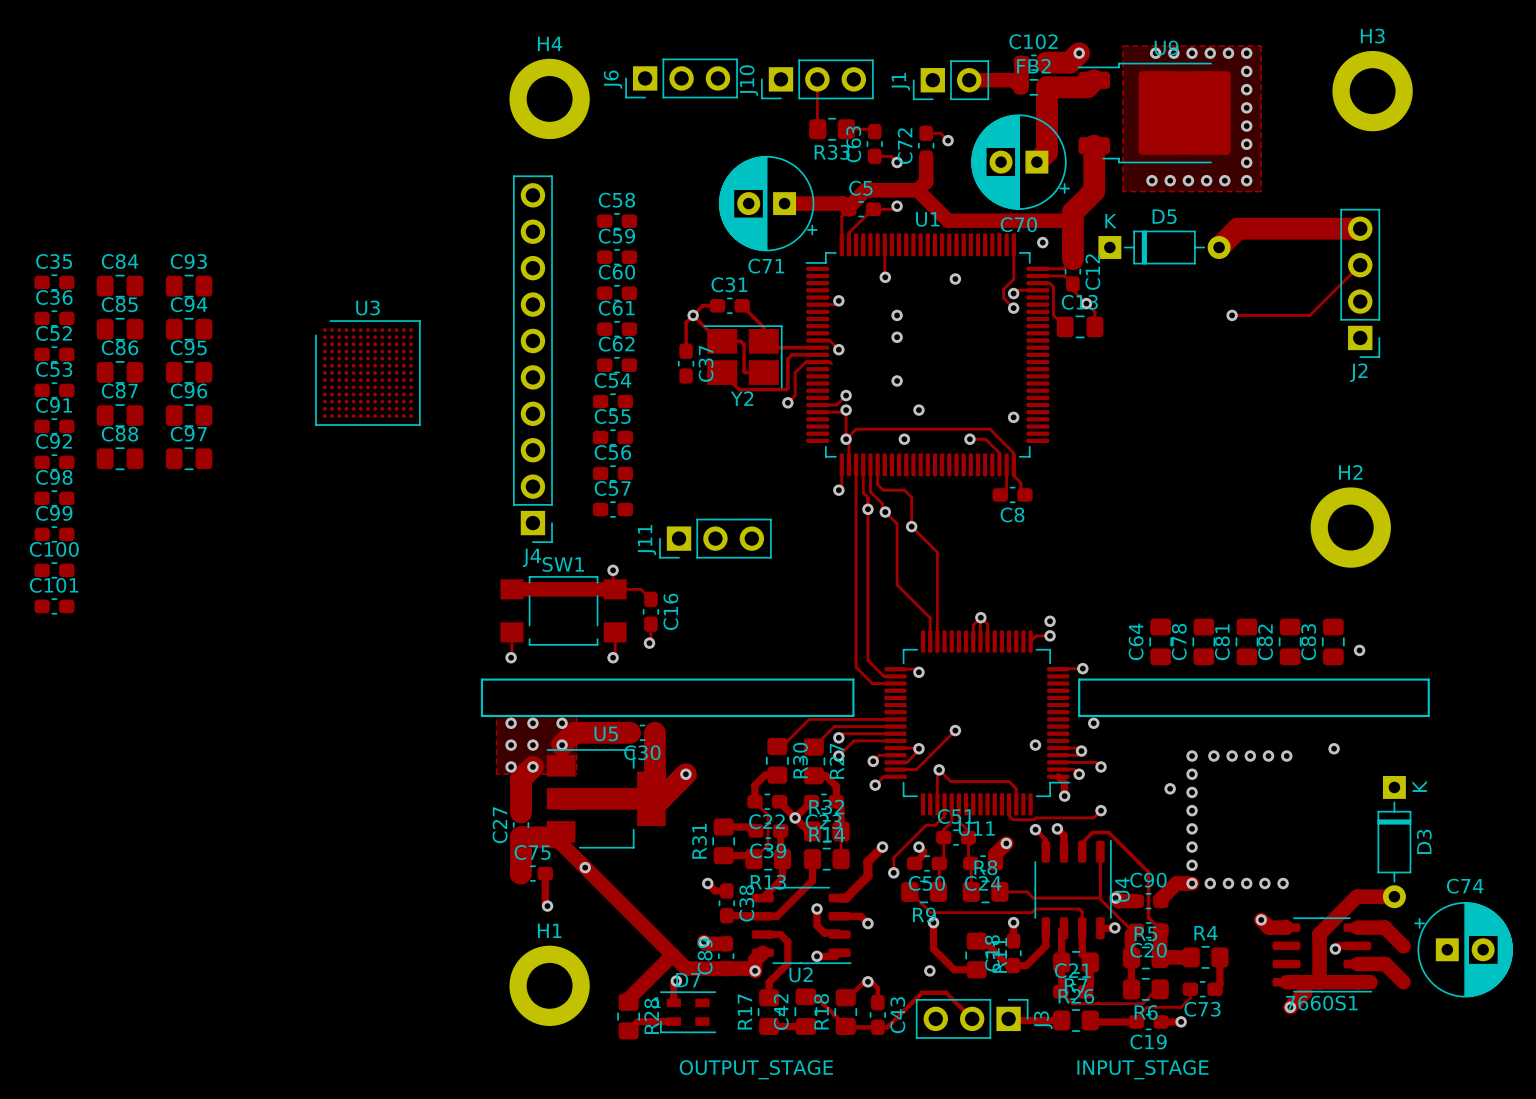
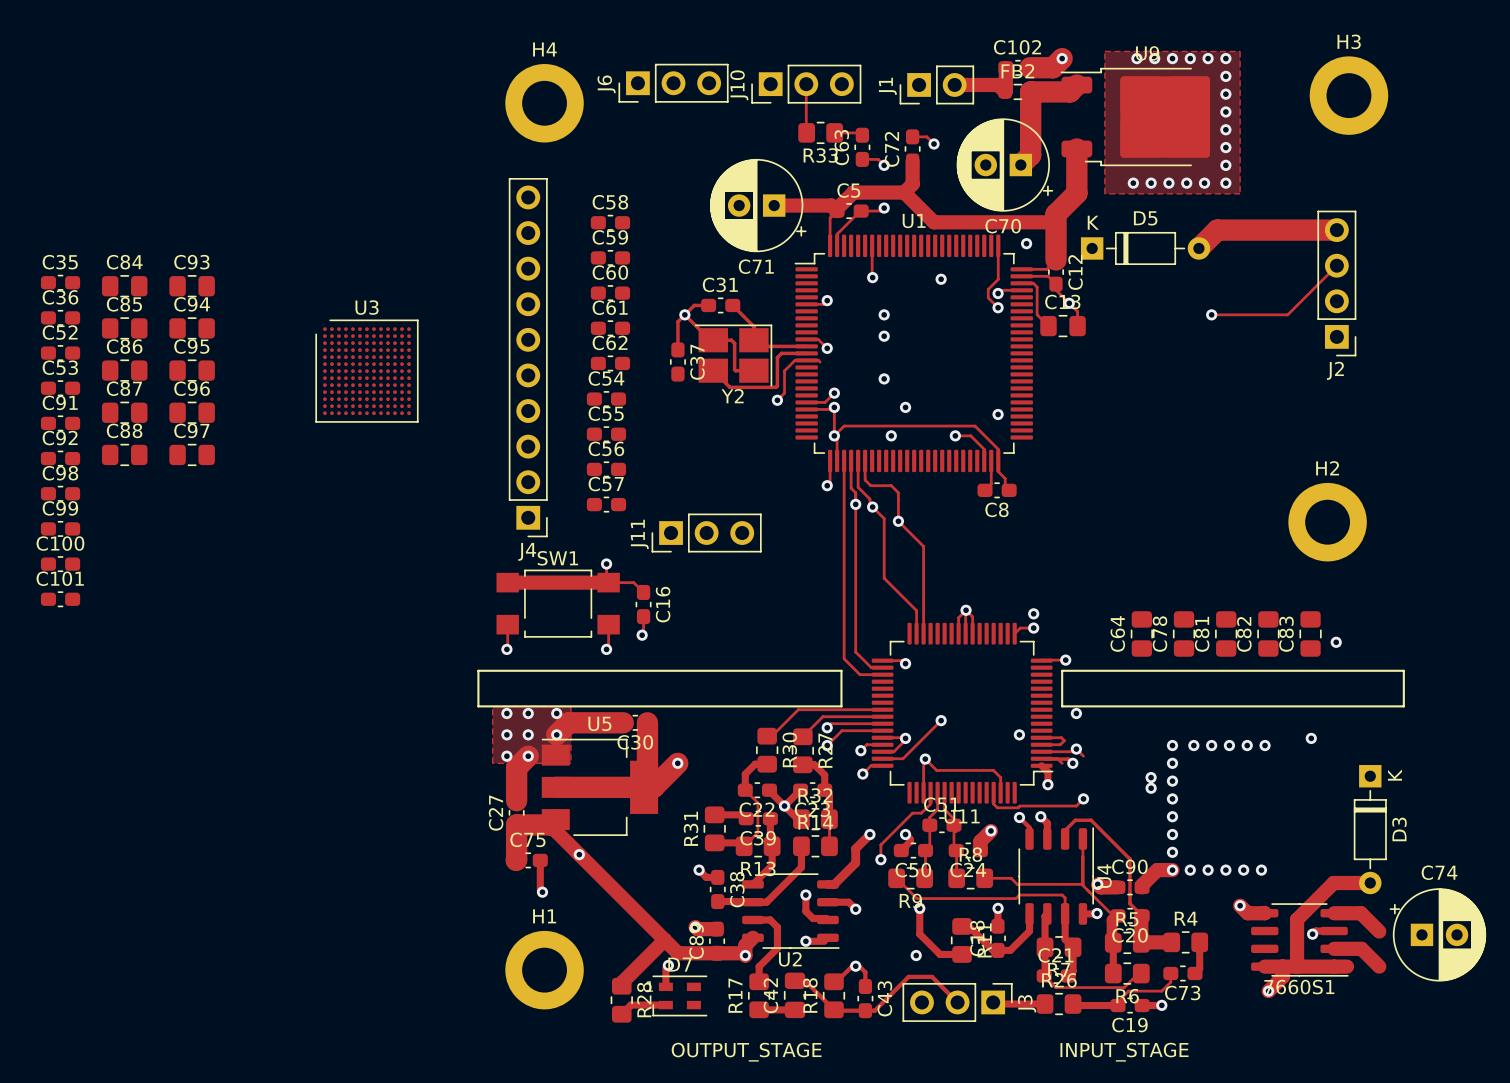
via: (1081, 751) -> none
via: none -> (1076, 749)
via: (1101, 766) -> none
track: none -> (1046, 759) (1068, 759) (1072, 763)
via: (1079, 774) -> none
via: none -> (1072, 763)
via: none -> (1151, 788)

